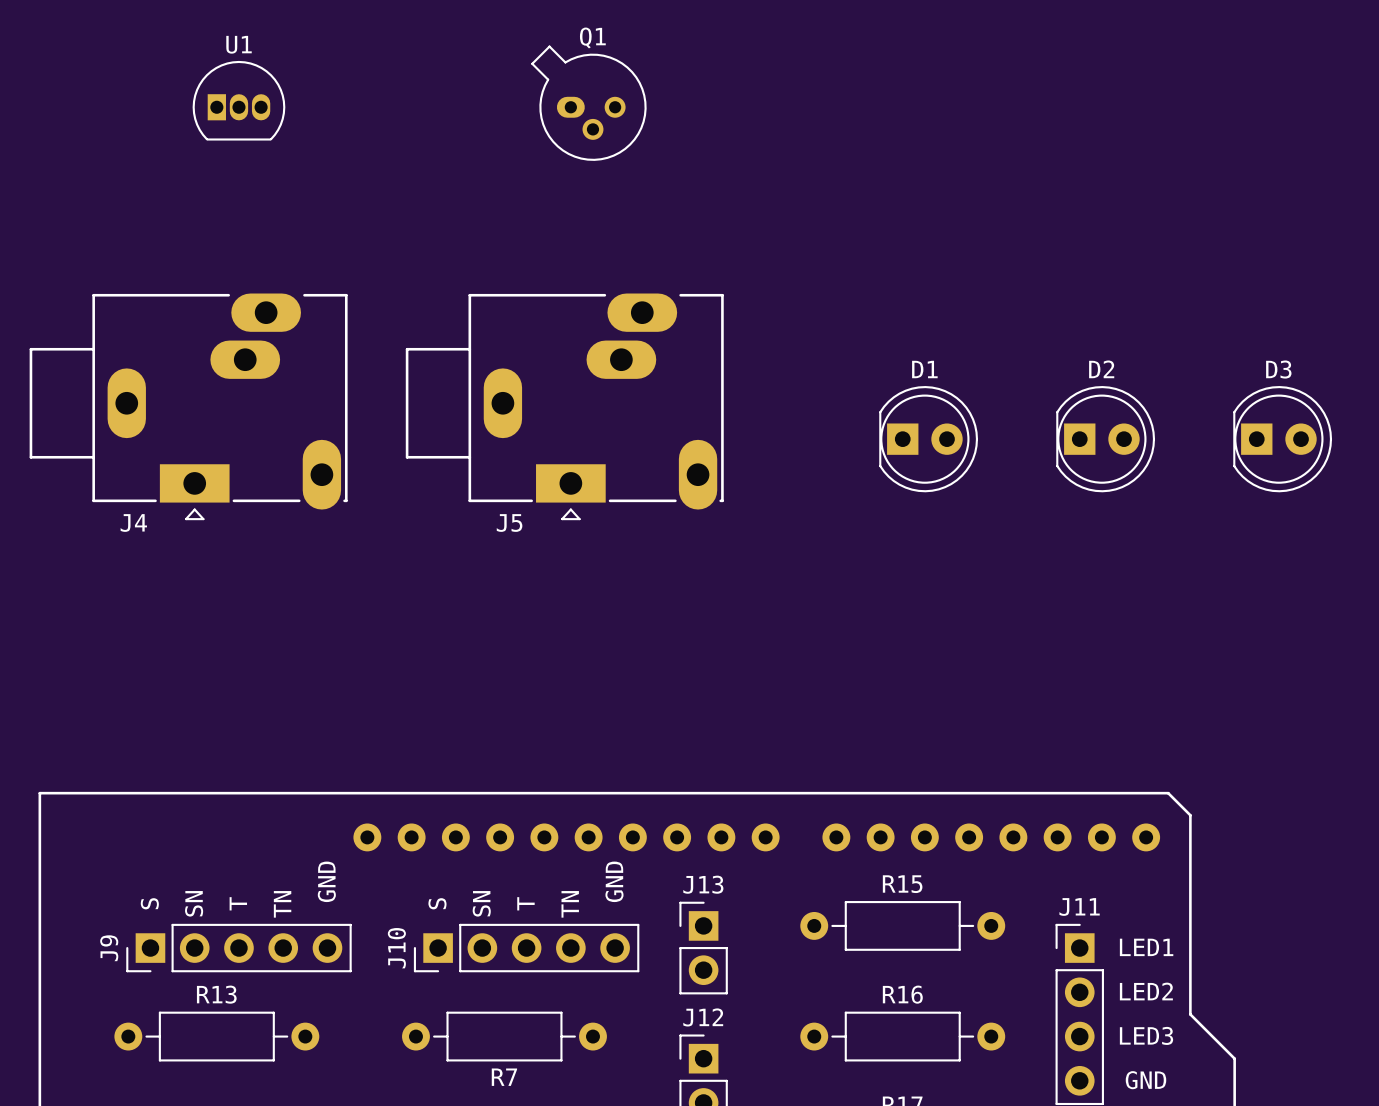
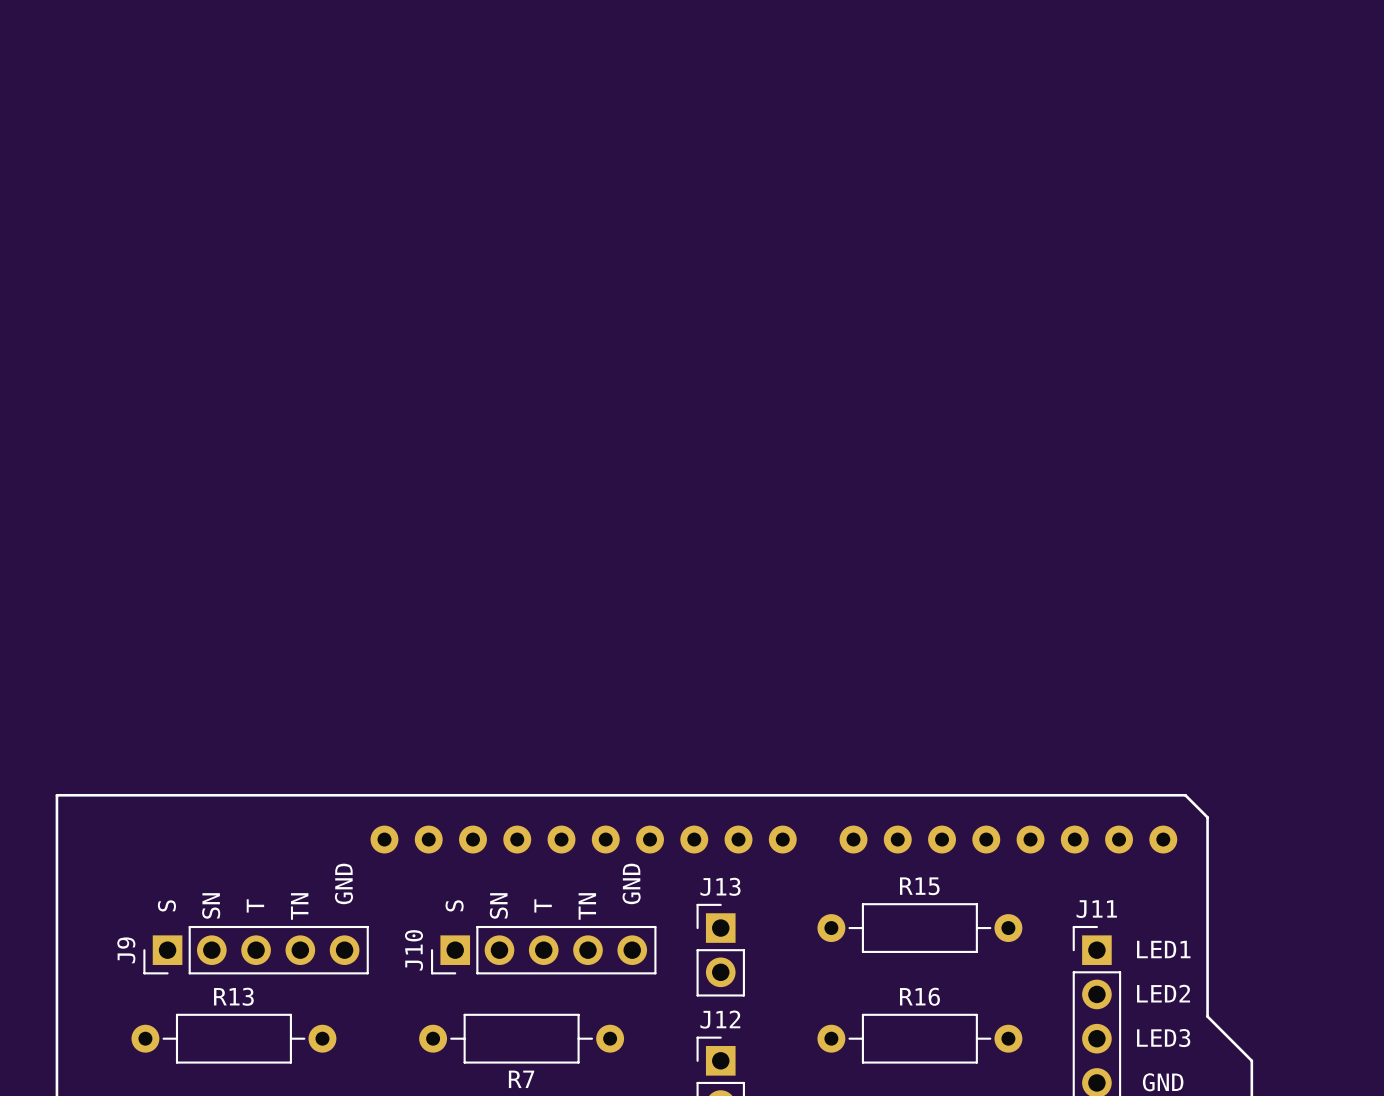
U1: (238, 100) -> none
Q1: (588, 103) -> none
J4: (188, 406) -> none
J5: (564, 406) -> none
D1: (928, 439) -> none
D2: (1105, 439) -> none
D3: (1282, 439) -> none

